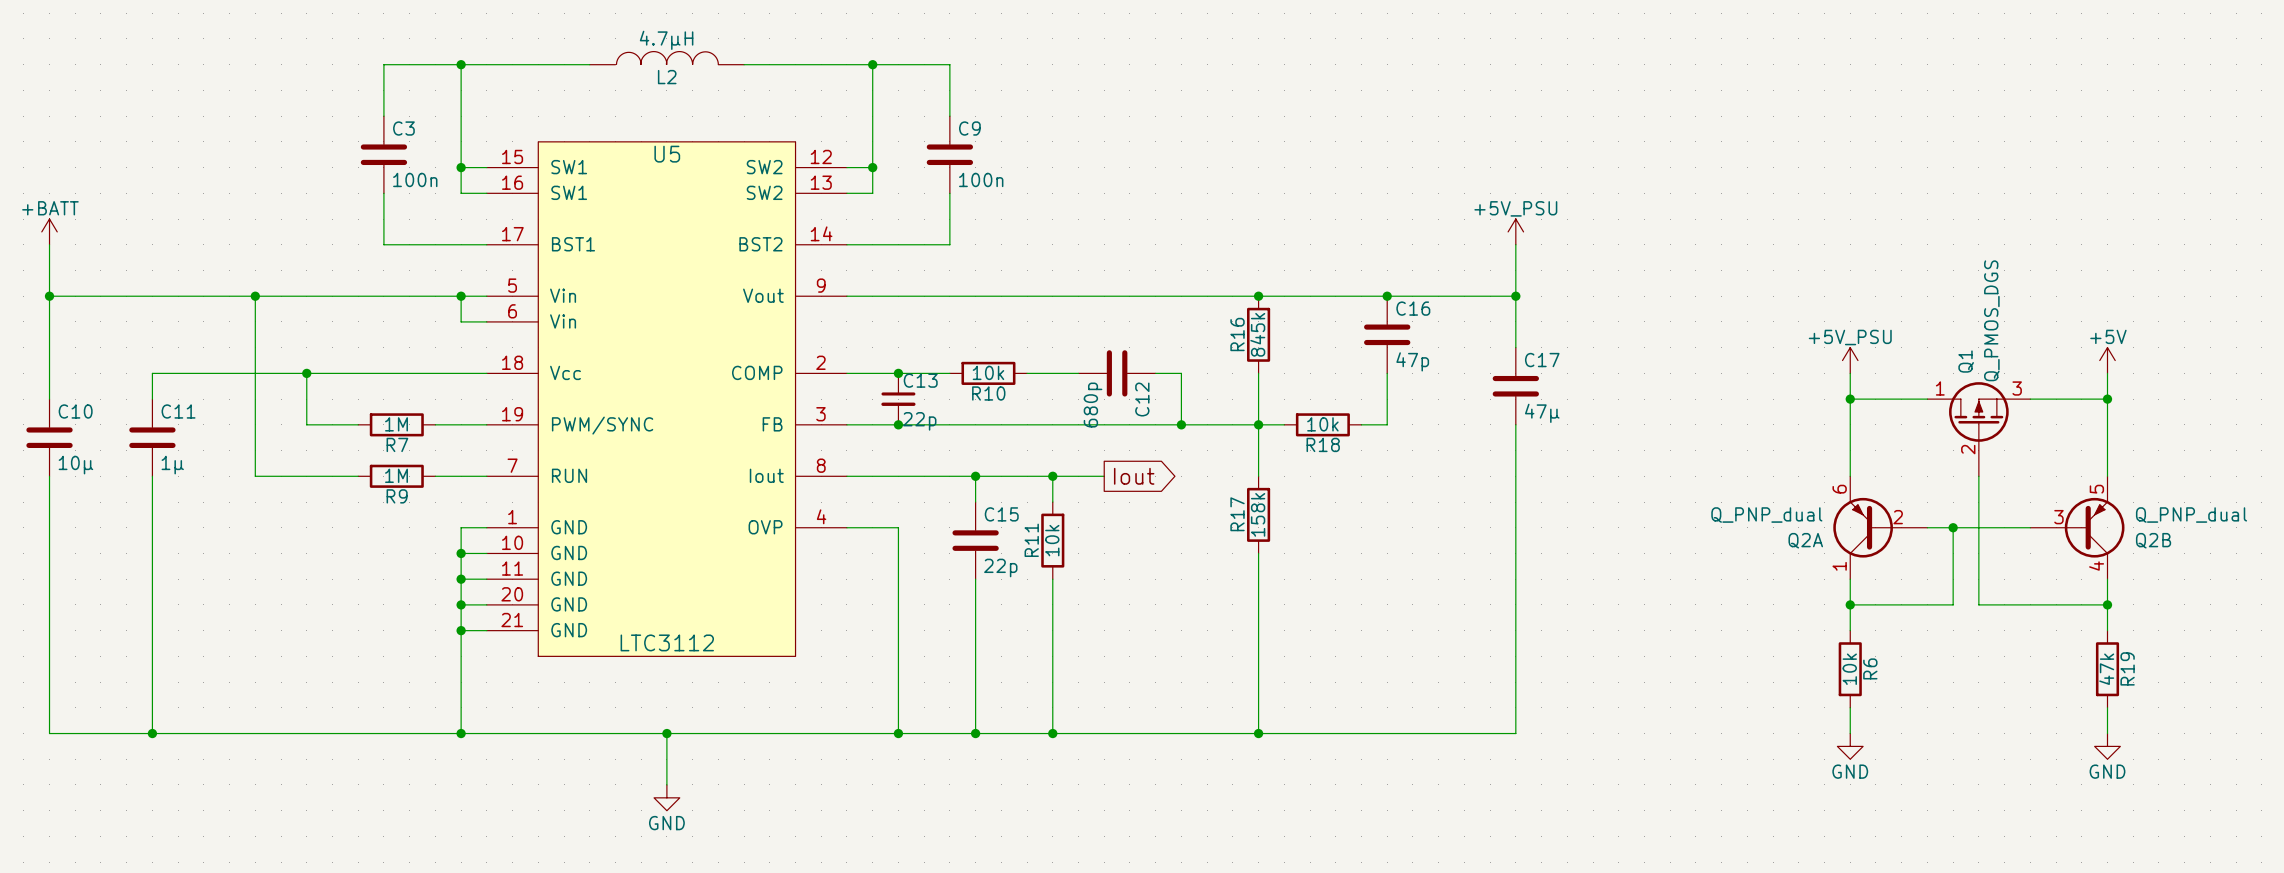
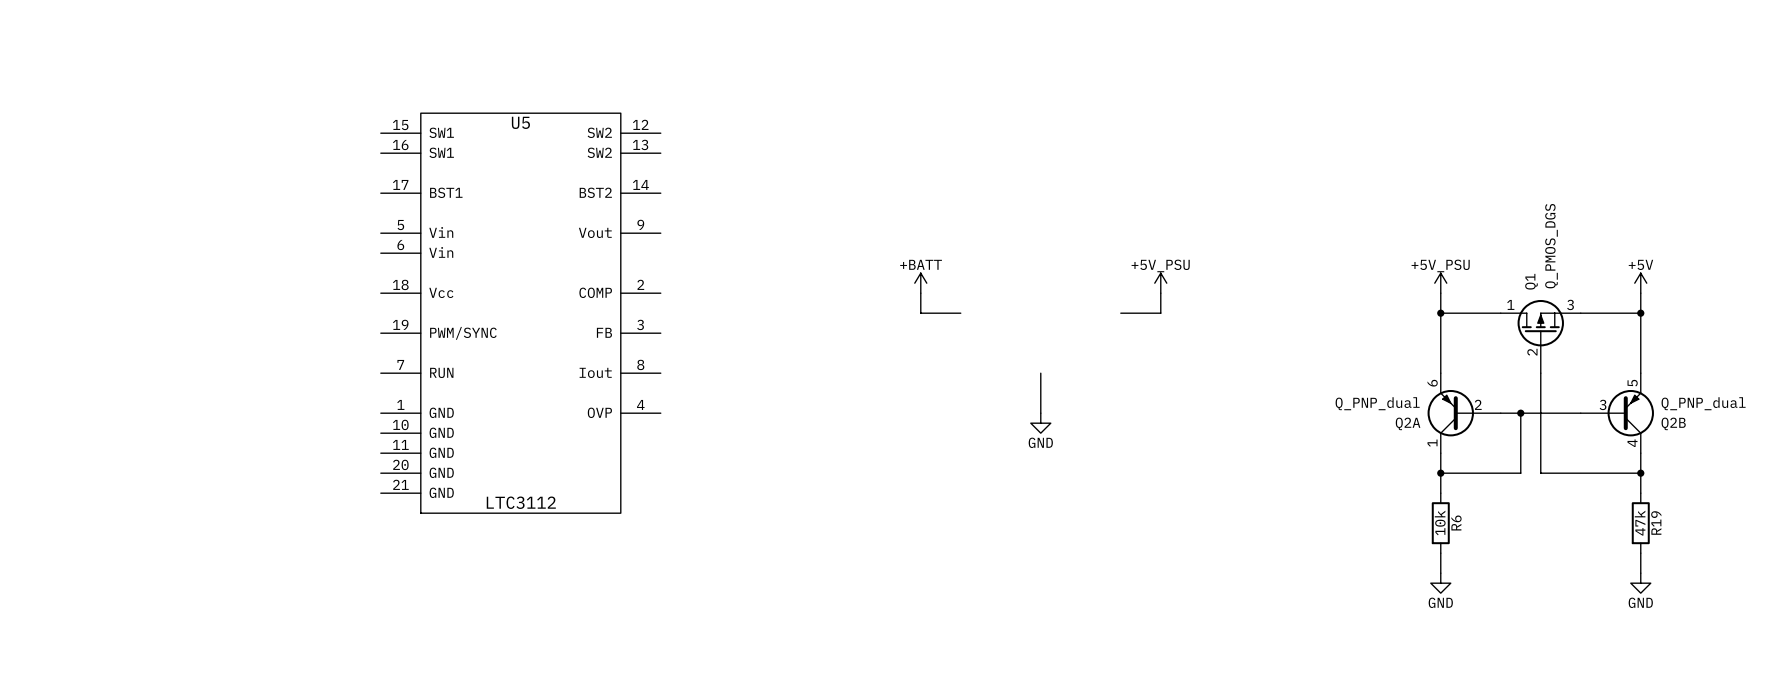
L2: 4.7µH (666, 58) -> none
wire: (461, 64) (461, 193) (486, 193) -> none
junction: (461, 64) -> none
wire: (589, 64) (383, 64) (383, 116) -> none
wire: (744, 64) (949, 64) (949, 116) -> none
wire: (872, 64) (872, 193) (846, 193) -> none
junction: (872, 64) -> none
C3: 100n (383, 154) -> none
C9: 100n (949, 154) -> none
wire: (461, 167) (486, 167) -> none
junction: (461, 167) -> none
wire: (846, 167) (872, 167) -> none
junction: (872, 167) -> none
wire: (383, 193) (383, 244) (486, 244) -> none
wire: (949, 193) (949, 244) (846, 244) -> none
power symbol: +BATT (49, 231) -> none
power symbol position: +5V_PSU (1515, 231) -> +5V_PSU (1160, 283)
wire: (49, 244) (49, 399) -> none
wire: (1515, 244) (1515, 347) -> none
wire: (49, 296) (486, 296) -> none
junction: (49, 296) -> none
wire: (255, 296) (255, 476) (358, 476) -> none
junction: (255, 296) -> none
wire: (461, 296) (461, 321) (486, 321) -> none
junction: (461, 296) -> none
wire: (846, 296) (1515, 296) -> none
junction: (1258, 296) -> none
junction: (1387, 296) -> none
junction: (1515, 296) -> none
R16: 845k (1258, 334) -> none
C16: 47p (1387, 334) -> none
power symbol: none -> +BATT (920, 283)
wire: (306, 373) (306, 424) (358, 424) -> none
junction: (306, 373) -> none
wire: (486, 373) (152, 373) (152, 399) -> none
wire: (846, 373) (949, 373) -> none
junction: (898, 373) -> none
R10: 10k (988, 373) -> none
wire: (1027, 373) (1078, 373) -> none
C12: 680p (1117, 373) -> none
wire: (1155, 373) (1181, 373) -> none
wire: (1258, 373) (1258, 476) -> none
wire: (1387, 373) (1387, 424) (1361, 424) -> none
wire: none -> (1160, 293) (1160, 313) (1120, 313)
C17: 47µ (1515, 386) -> none
C13: 22p (898, 399) -> none
wire: (1181, 399) (1181, 424) -> (920, 313) (960, 313)
R7: 1M (396, 424) -> none
wire: (435, 424) (486, 424) -> none
wire: (846, 424) (1284, 424) -> none
junction: (898, 424) -> none
junction: (1181, 424) -> none
junction: (1258, 424) -> none
R18: 10k (1322, 424) -> none
wire: (1515, 424) (1515, 733) (49, 733) (49, 476) -> none
C10: 10µ (49, 437) -> none
C11: 1µ (152, 437) -> none
wire: (152, 476) (152, 733) -> none
R9: 1M (396, 476) -> none
wire: (435, 476) (486, 476) -> none
wire: (846, 476) (1104, 476) -> none
wire: (975, 476) (975, 502) -> none
junction: (975, 476) -> none
wire: (1052, 476) (1052, 502) -> none
junction: (1052, 476) -> none
global label: Iout (1134, 476) -> none
wire: none -> (1040, 373) (1040, 413)
R17: 158k (1258, 514) -> none
wire: (486, 527) (461, 527) (461, 733) -> none
wire: (846, 527) (898, 527) (898, 733) -> none
C15: 22p (975, 540) -> none
R11: 10k (1052, 540) -> none
power symbol: none -> GND (1040, 423)
wire: (461, 553) (486, 553) -> none
junction: (461, 553) -> none
wire: (1258, 553) (1258, 733) -> none
wire: (461, 579) (486, 579) -> none
junction: (461, 579) -> none
wire: (975, 579) (975, 733) -> none
wire: (1052, 579) (1052, 733) -> none
wire: (461, 604) (486, 604) -> none
junction: (461, 604) -> none
wire: (461, 630) (486, 630) -> none
junction: (461, 630) -> none
junction: (152, 733) -> none
junction: (461, 733) -> none
wire: (666, 733) (666, 784) -> none
junction: (666, 733) -> none
junction: (898, 733) -> none
junction: (975, 733) -> none
junction: (1052, 733) -> none
junction: (1258, 733) -> none
power symbol: GND (666, 797) -> none

